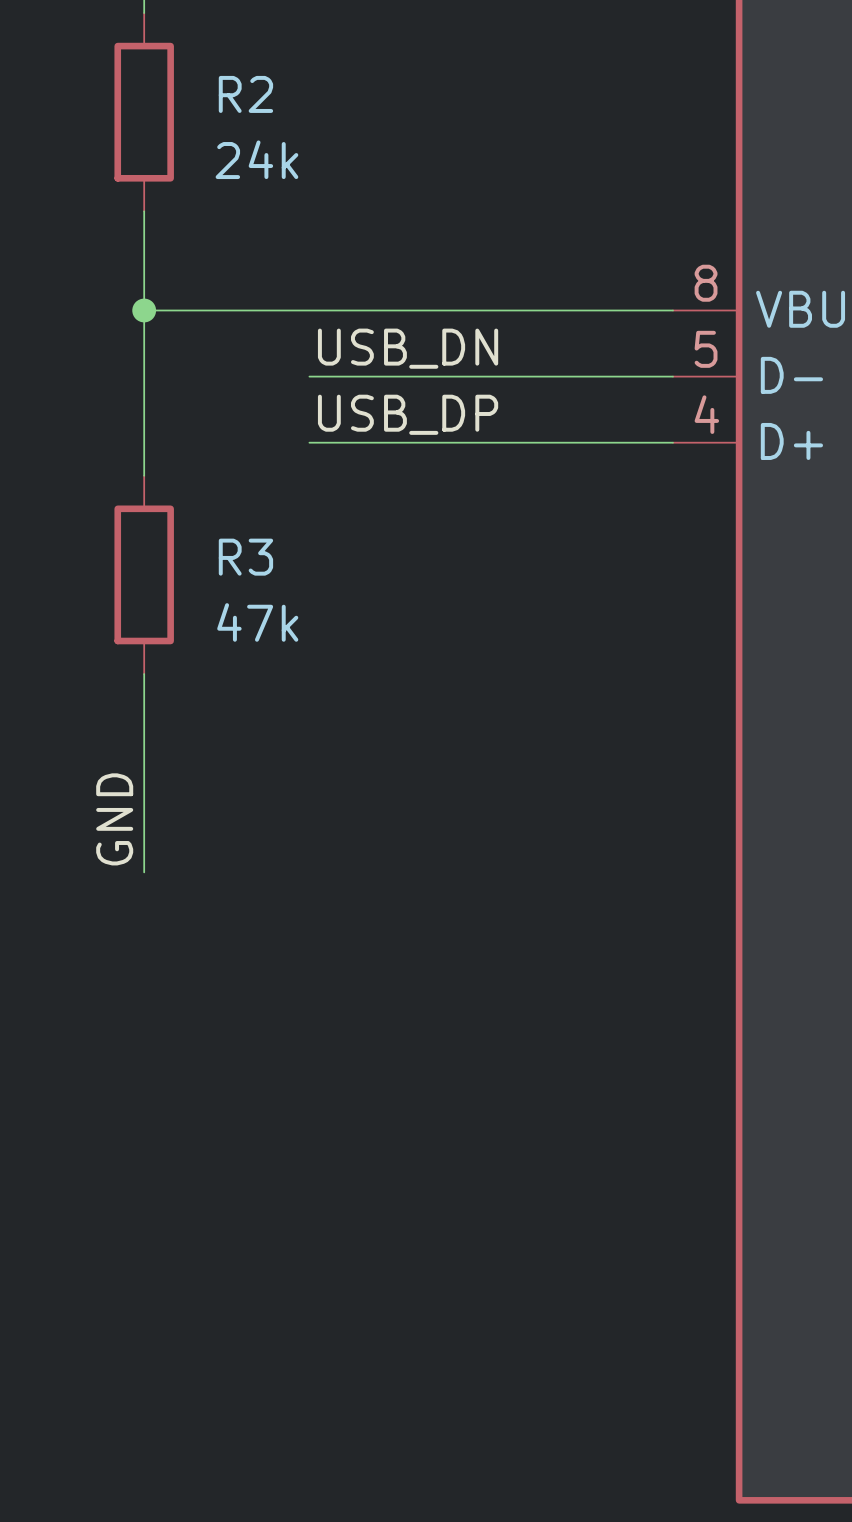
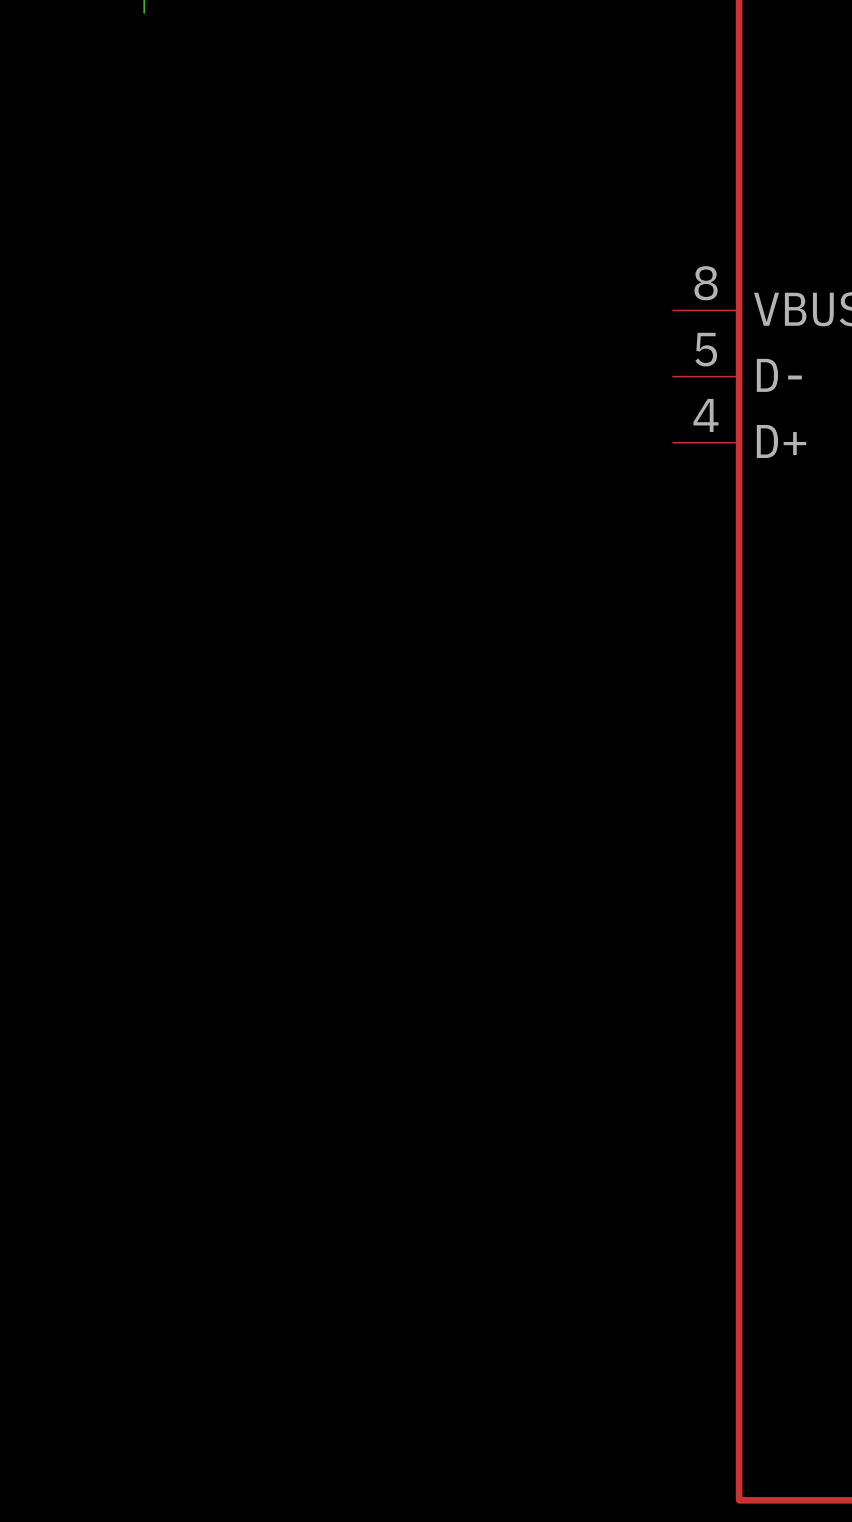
R2: 24k (144, 112) -> none
wire: (144, 211) (144, 475) -> none
wire: (144, 310) (673, 310) -> none
junction: (144, 310) -> none
label: USB_DN (408, 348) -> none
wire: (309, 376) (673, 376) -> none
label: USB_DP (408, 414) -> none
wire: (309, 442) (673, 442) -> none
R3: 47k (144, 574) -> none
wire: (144, 674) (144, 872) -> none
label: GND (114, 819) -> none

